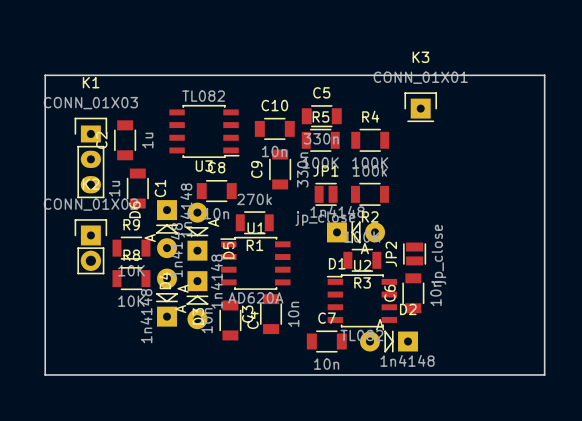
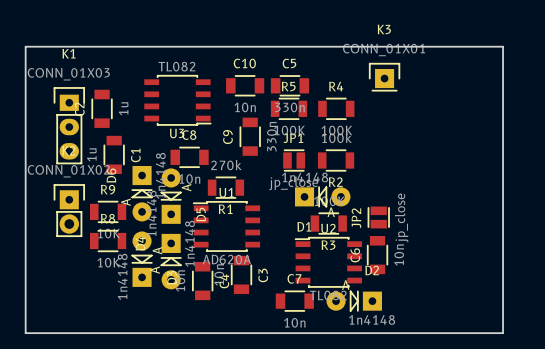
C10 position: (274, 128) -> (245, 85)
C3 name position: C3 (247, 314) -> C3 (263, 275)
C3 value position: 10n (293, 314) -> 10n (219, 274)

